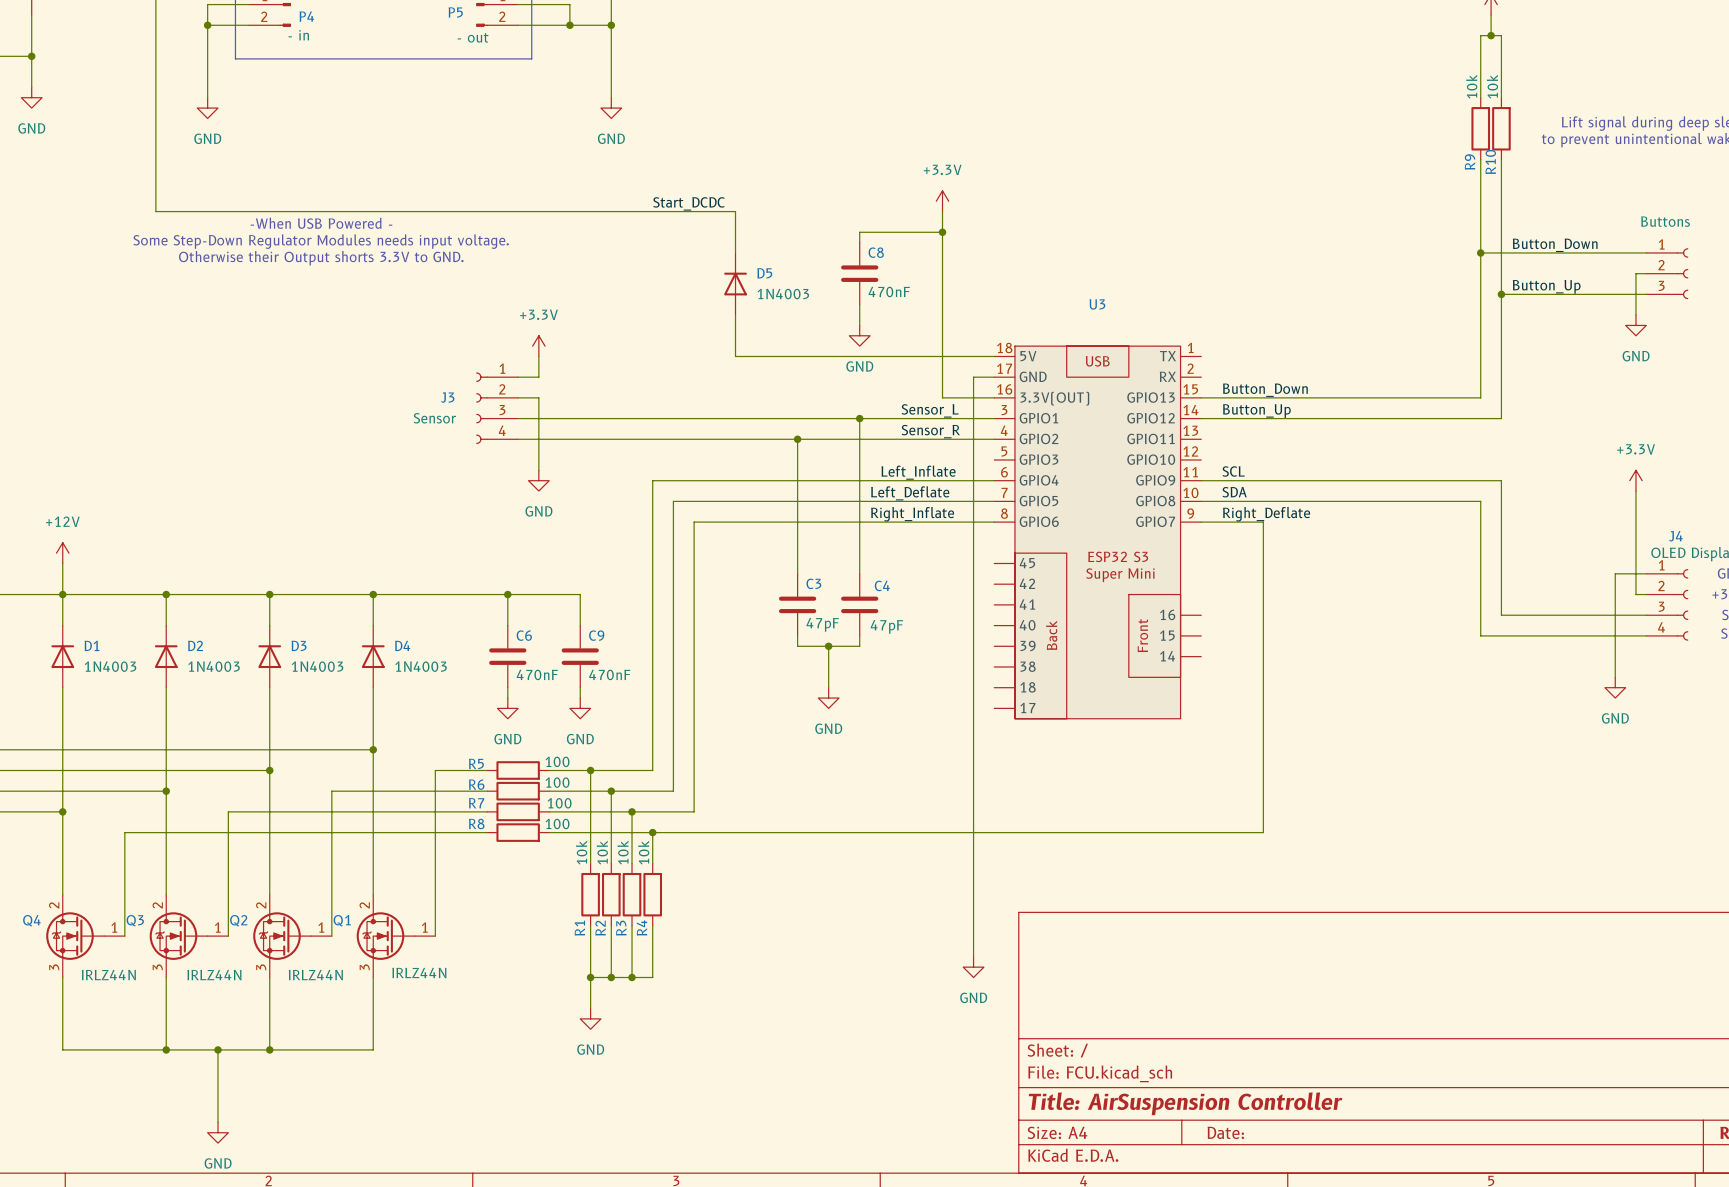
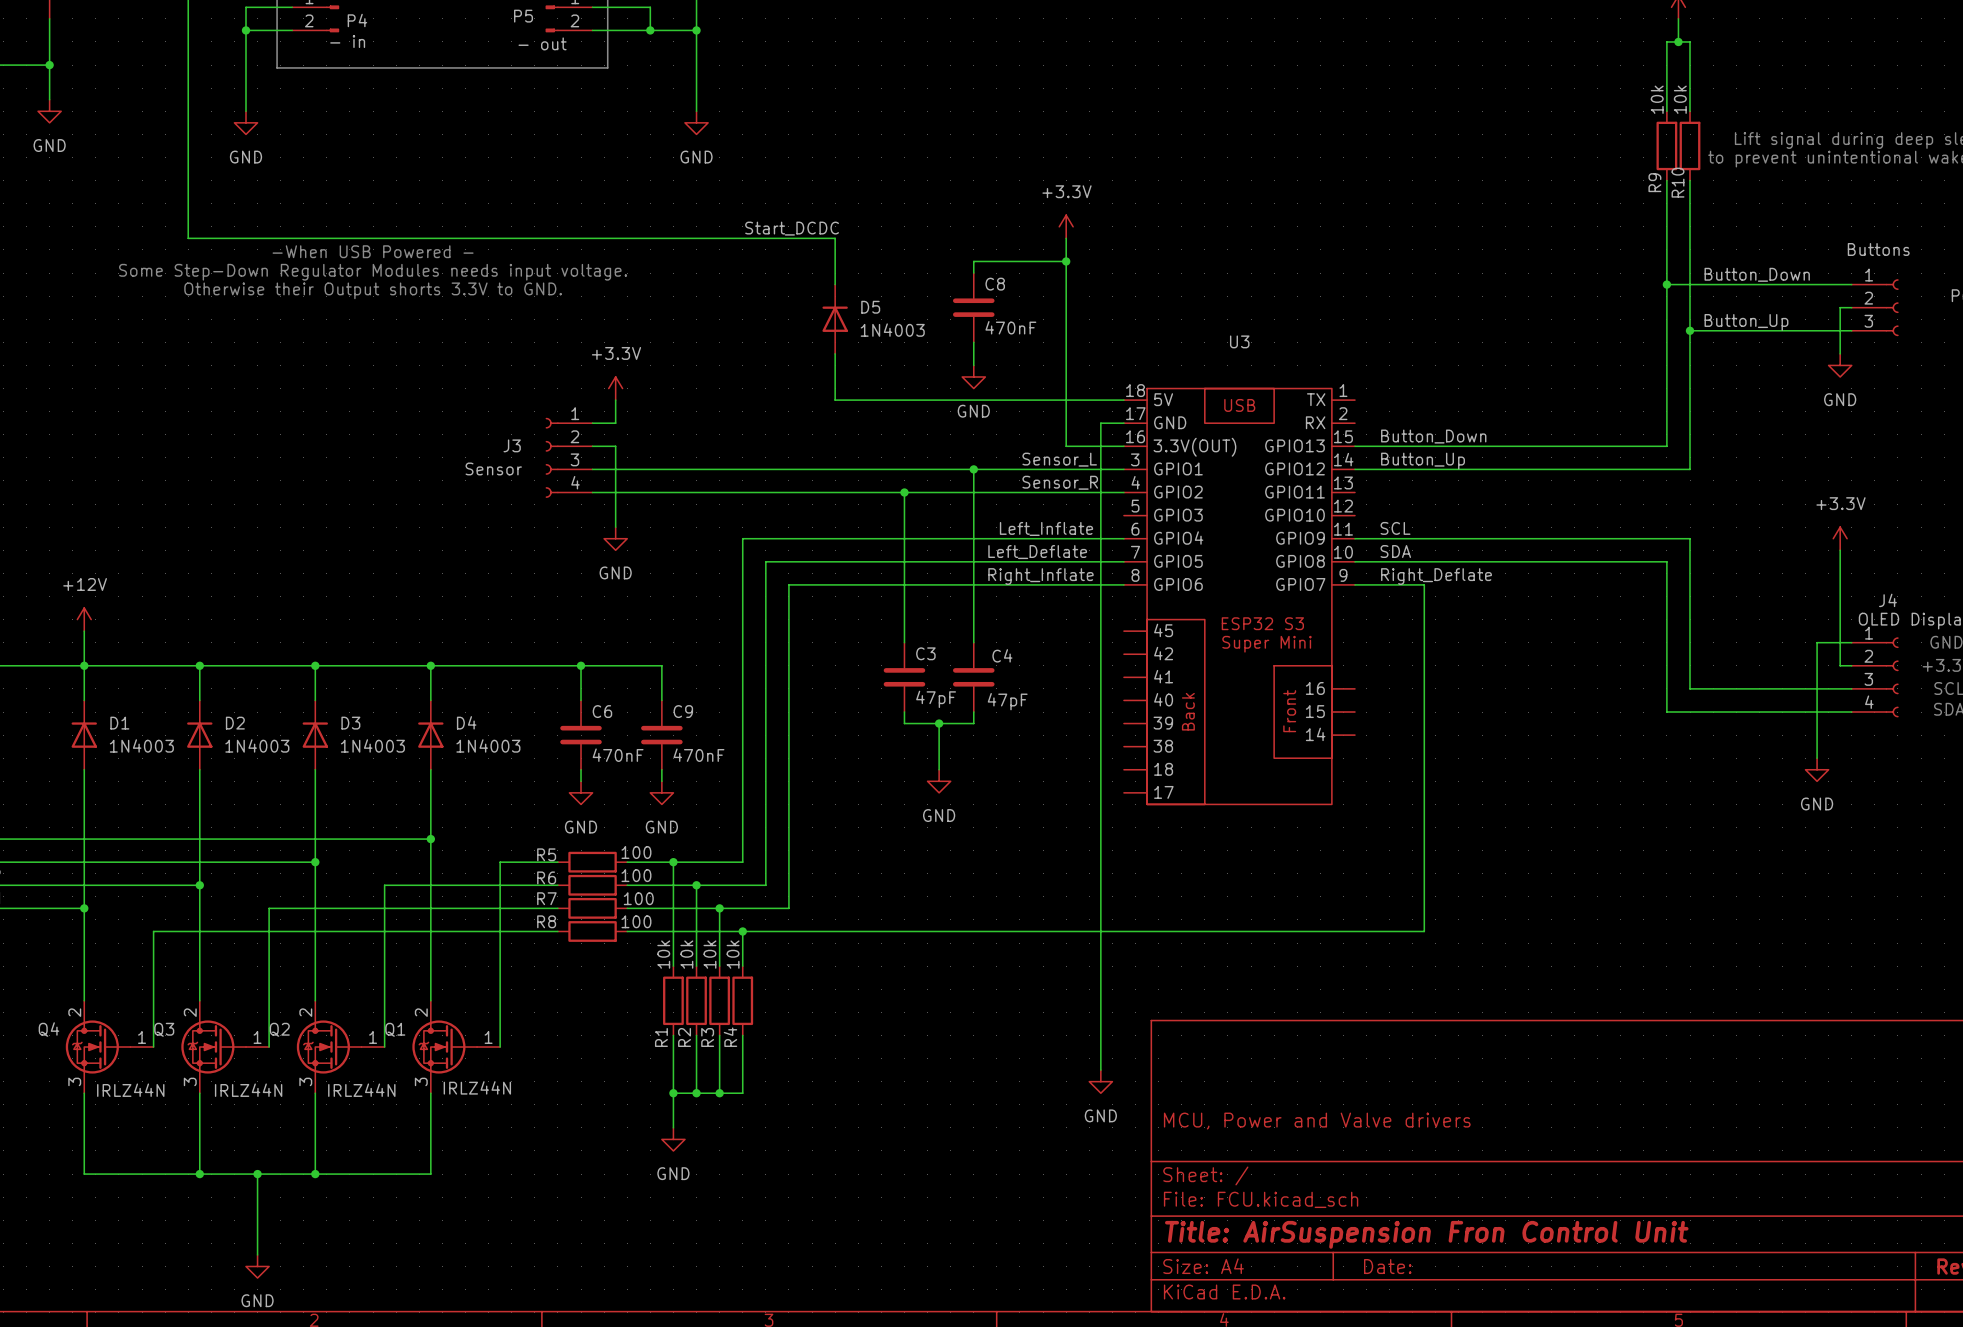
title block: none -> MCU, Power and Valve drivers (1317, 1121)
title block: Title: AirSuspension Controller (1185, 1103) -> Title: AirSuspension Fron Control Unit (1426, 1234)

